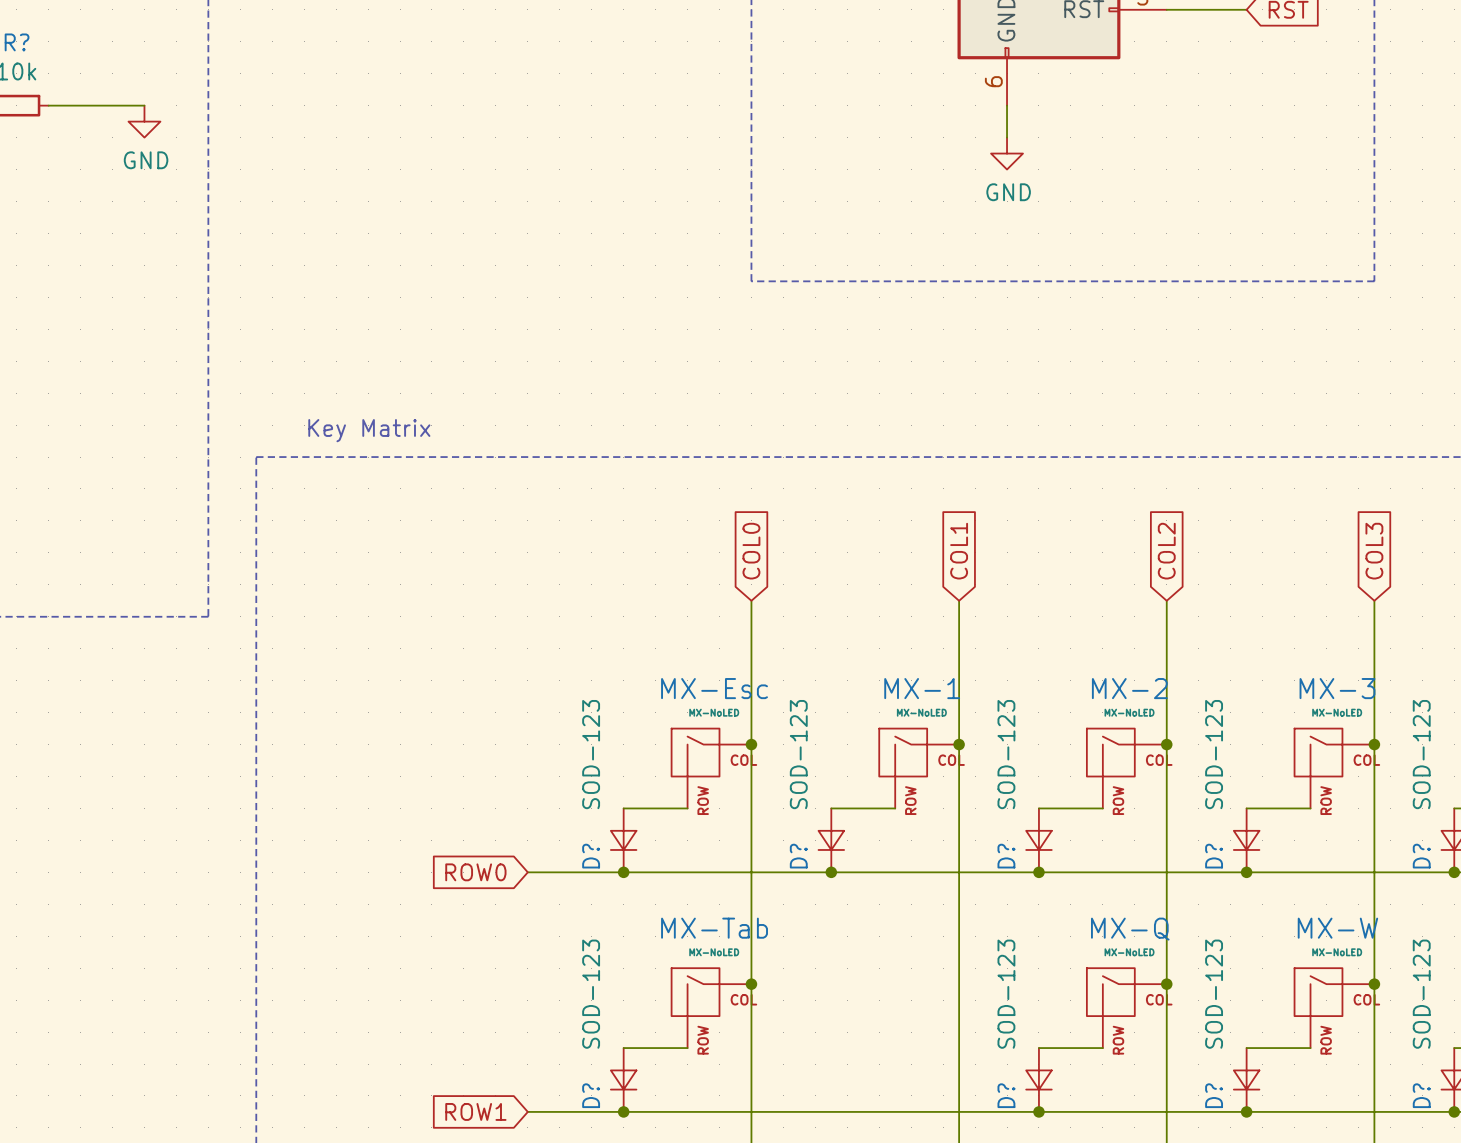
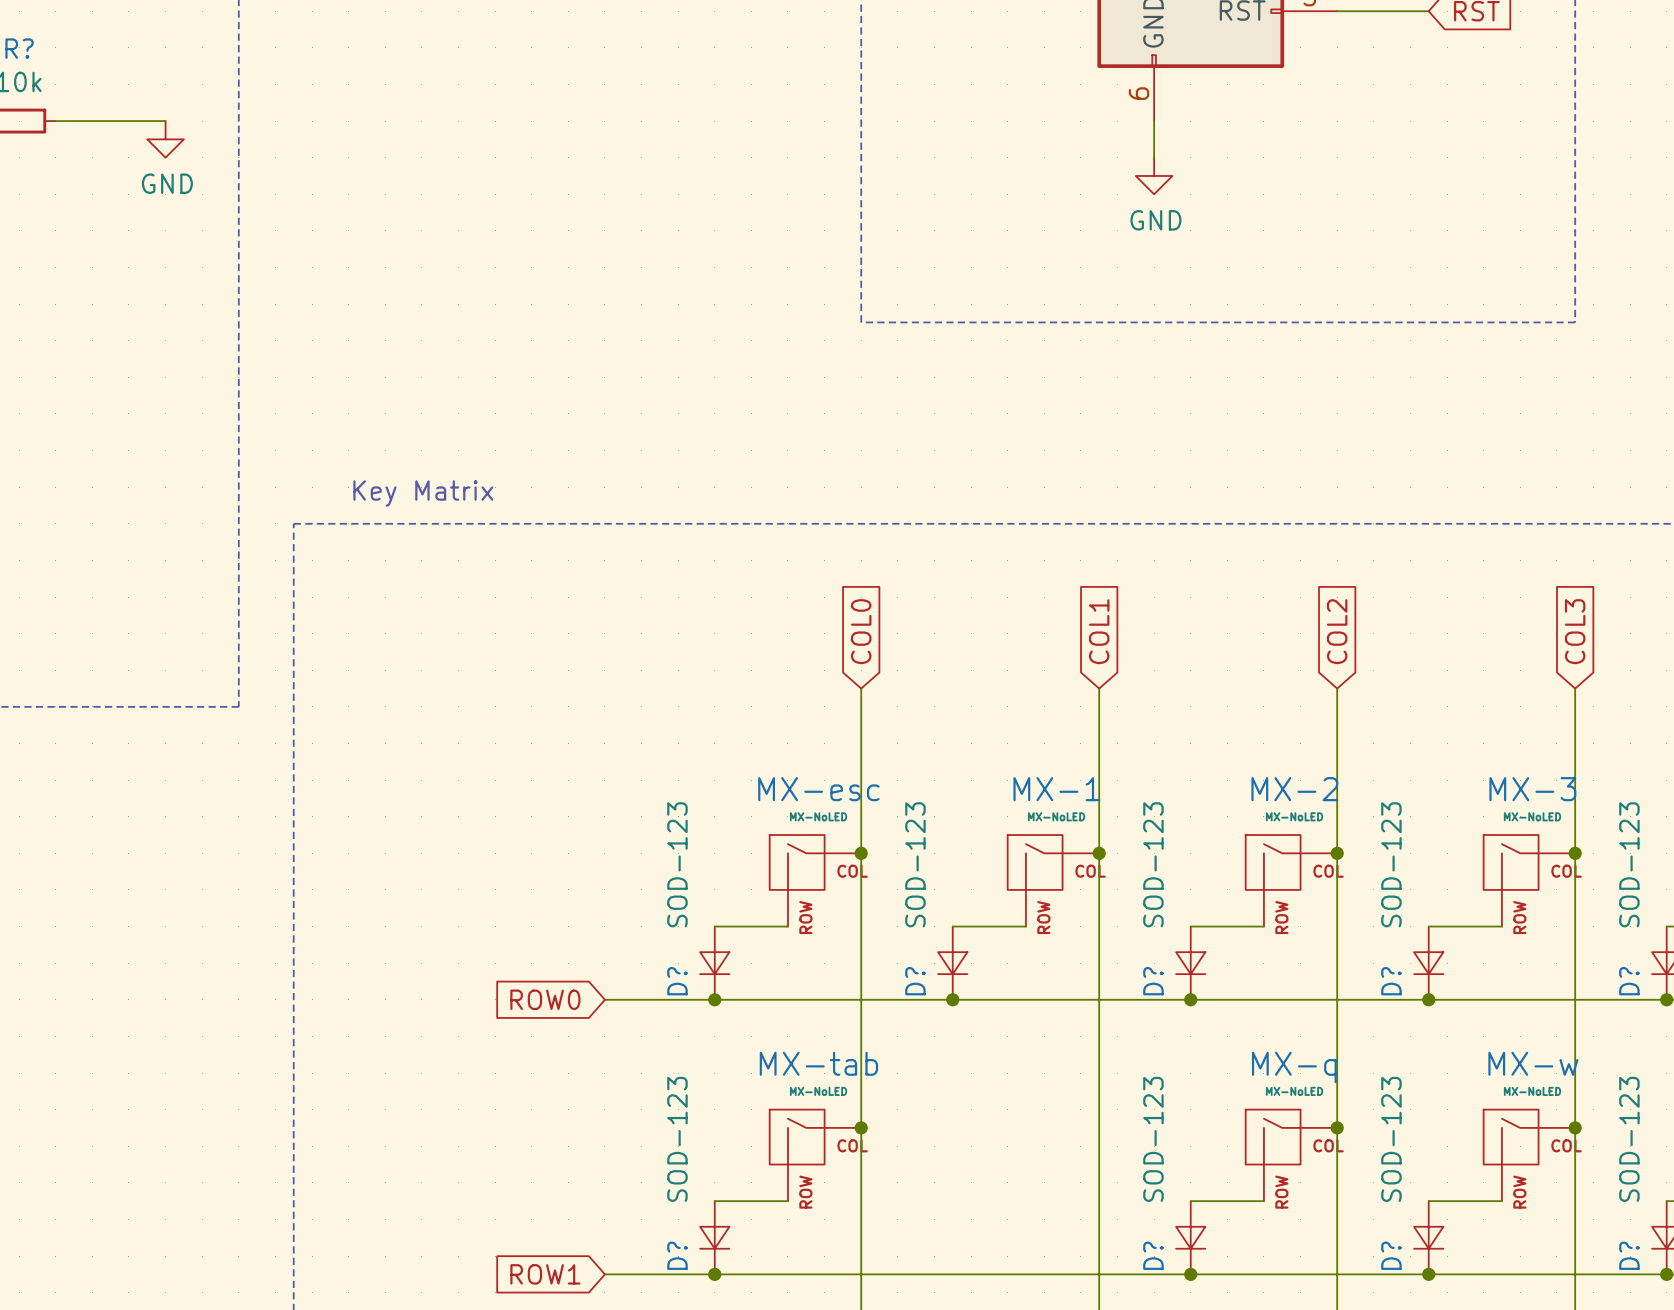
MX-Esc name: MX-Esc (714, 688) -> MX-esc (818, 789)
MX-Tab name: MX-Tab (714, 928) -> MX-tab (818, 1063)
MX-W name: MX-W (1337, 928) -> MX-w (1533, 1063)
MX-Q name: MX-Q (1130, 929) -> MX-q (1294, 1067)

